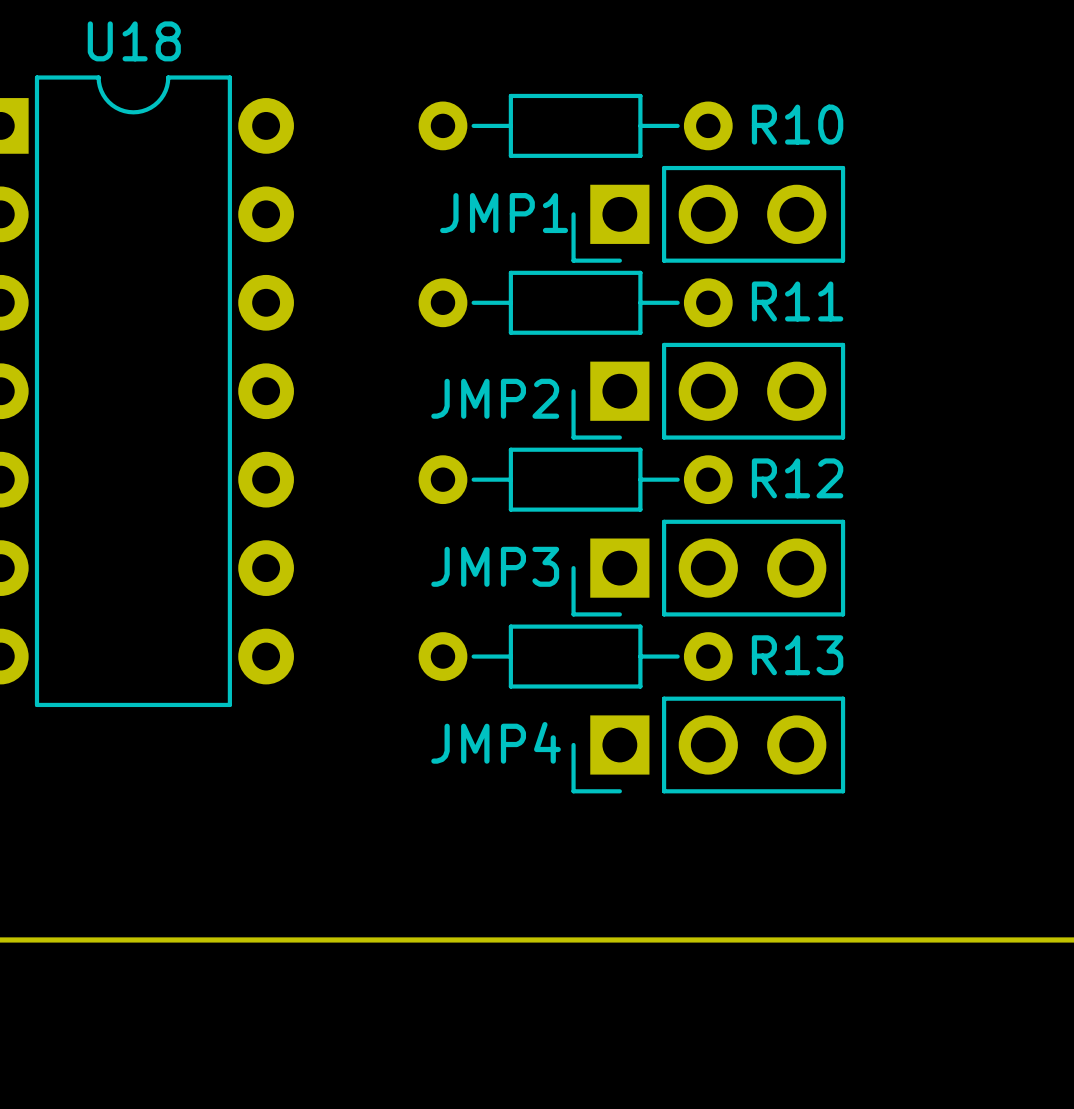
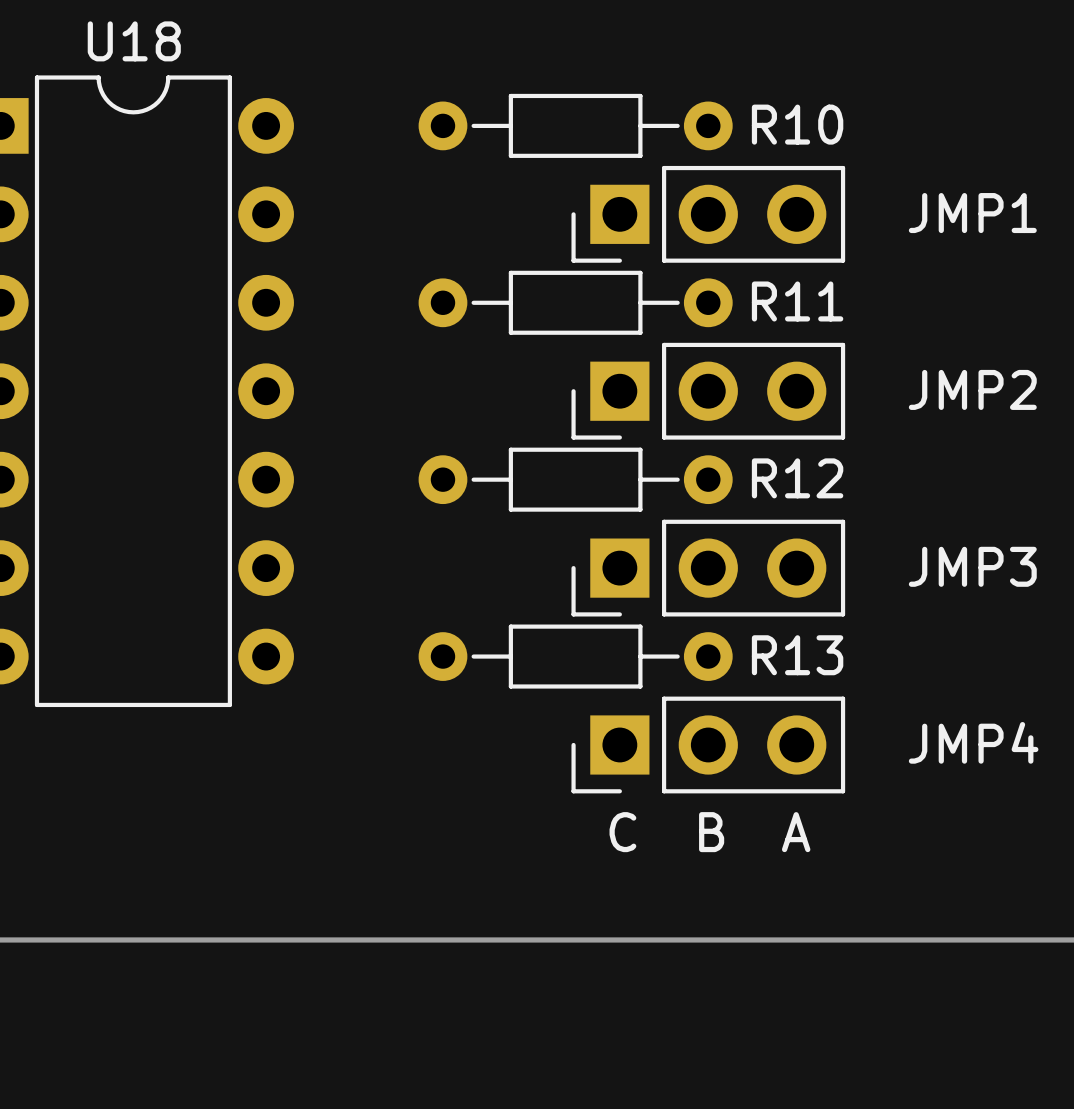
JMP1 name position: JMP1 (504, 213) -> JMP1 (972, 213)
JMP2 name position: JMP2 (495, 398) -> JMP2 (972, 389)
JMP3 name position: JMP3 (495, 566) -> JMP3 (972, 566)
JMP4 name position: JMP4 (496, 742) -> JMP4 (973, 742)
JMP4 text: none -> C B A (709, 832)

